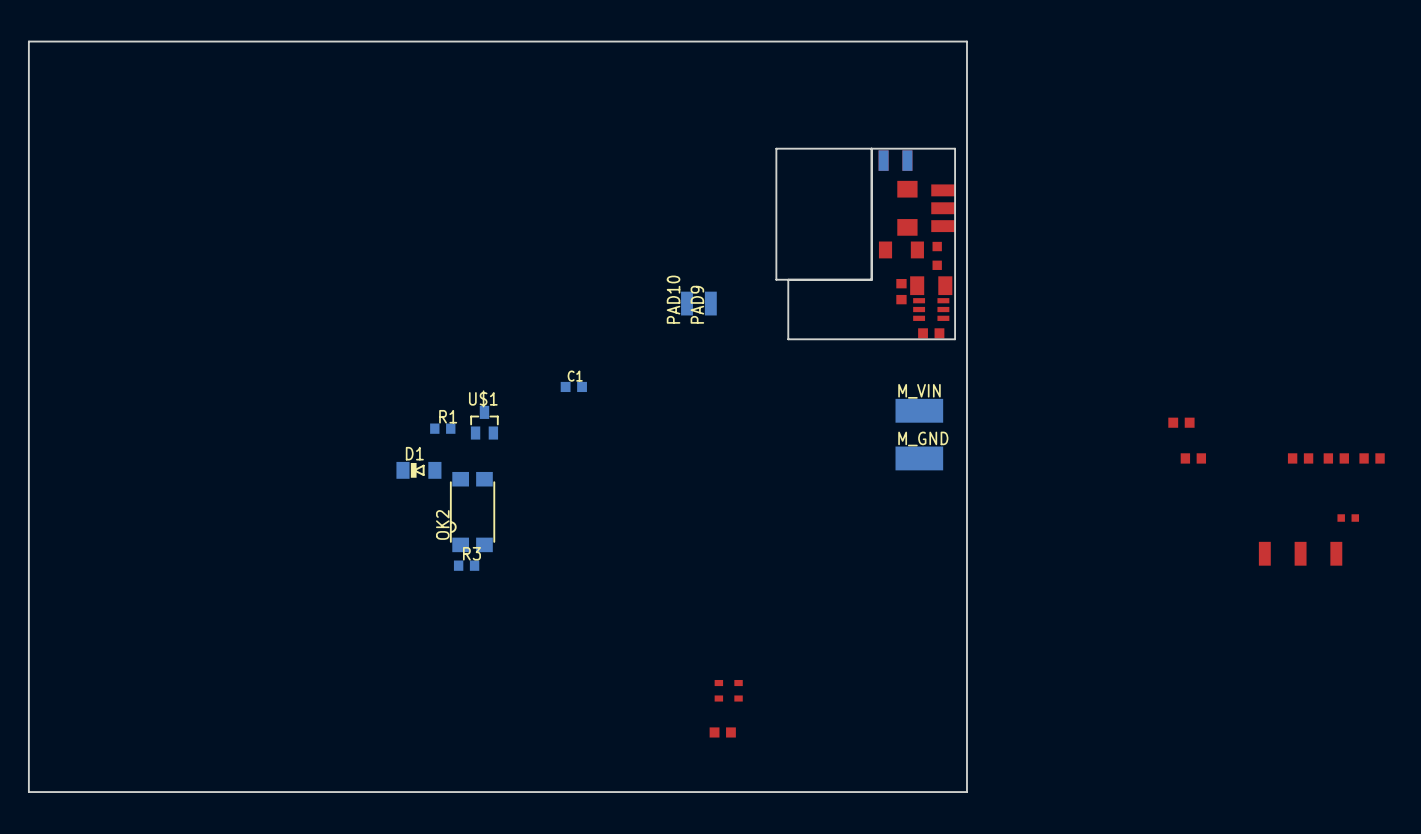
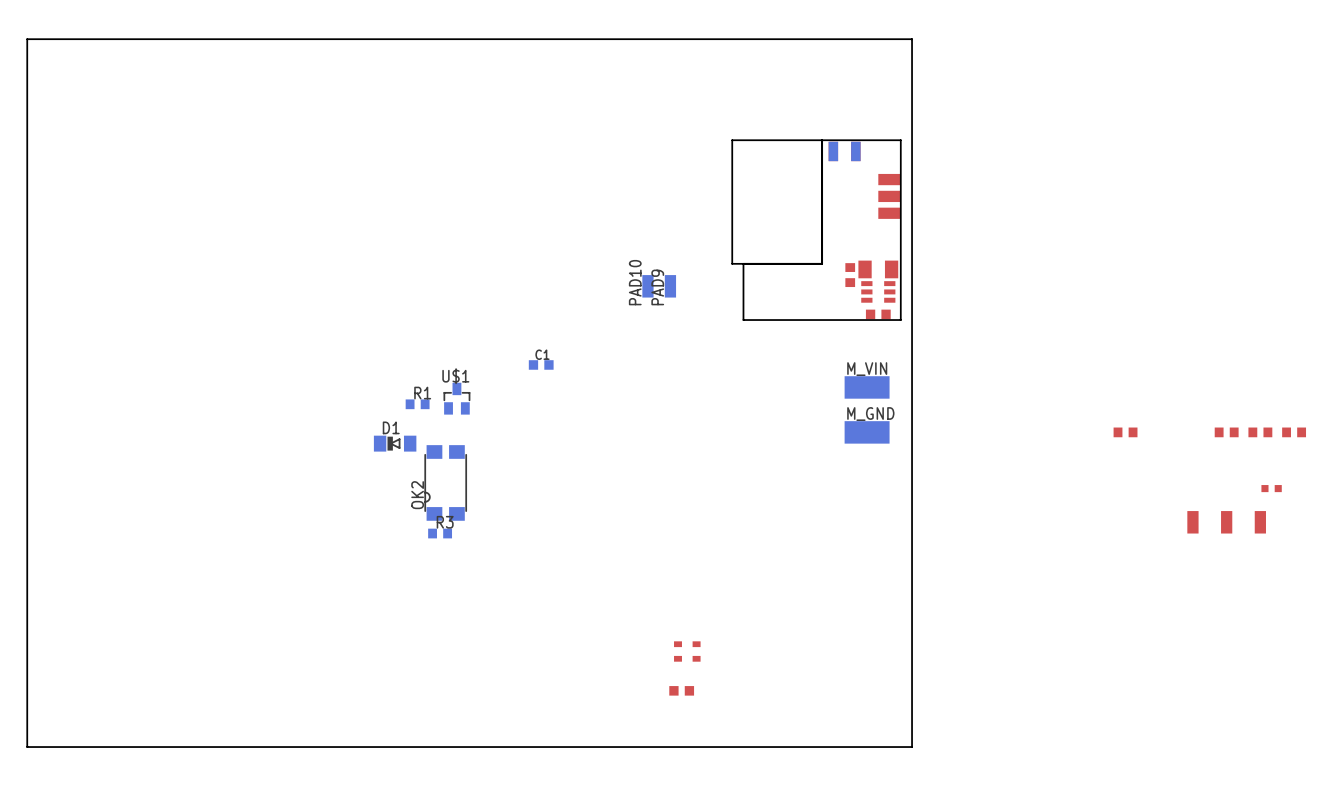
part: (907, 208) -> none
part: (901, 249) -> none
part: (937, 255) -> none
part: (1181, 422) -> none

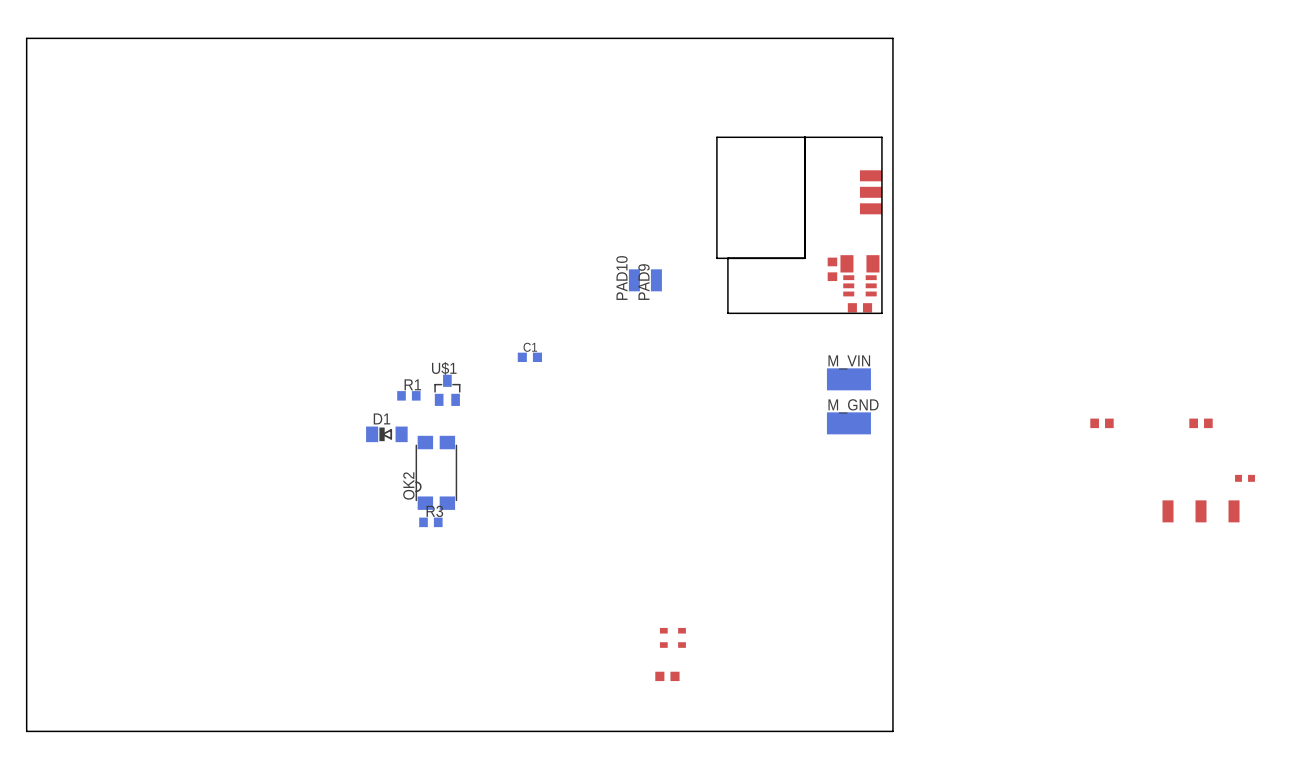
part: (844, 151) -> none
part: (1260, 432) -> none
part: (1294, 432) -> none

